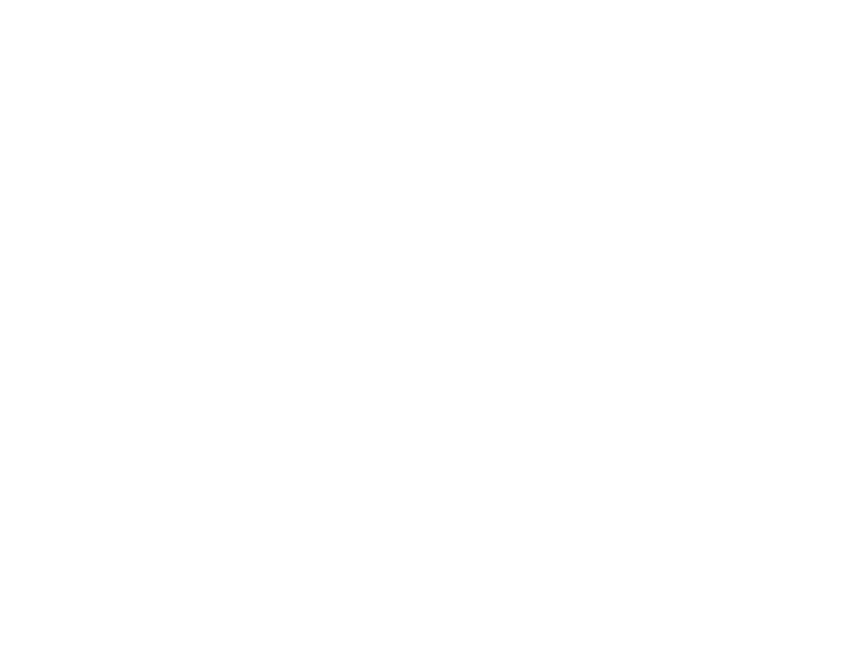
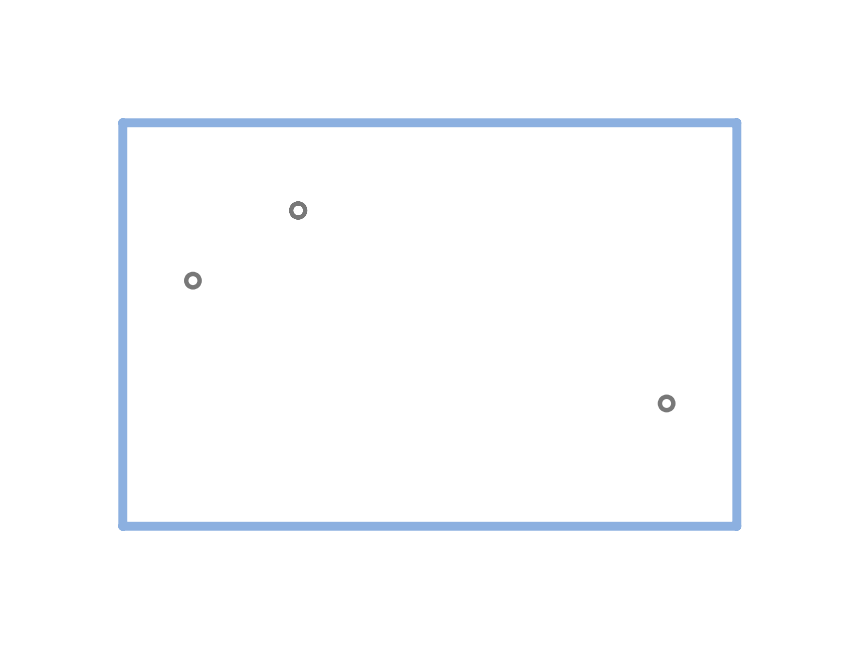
track: none -> (736, 122) (122, 122) (122, 526) (736, 526) (736, 122)
via: none -> (298, 210)
via: none -> (192, 280)
via: none -> (666, 403)

